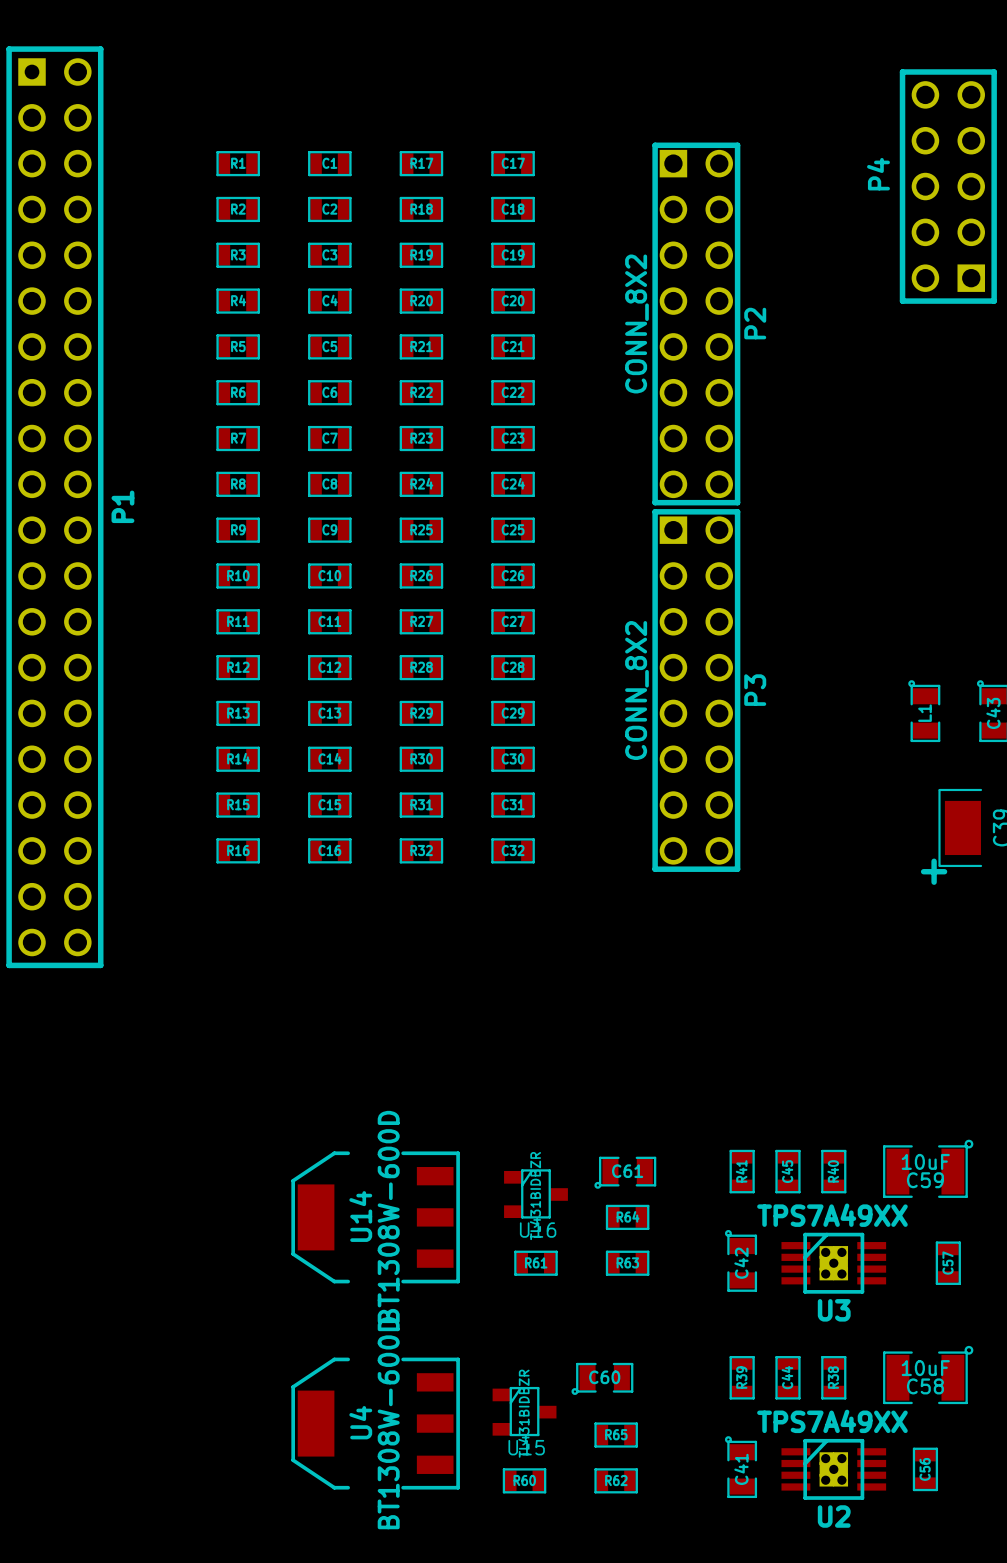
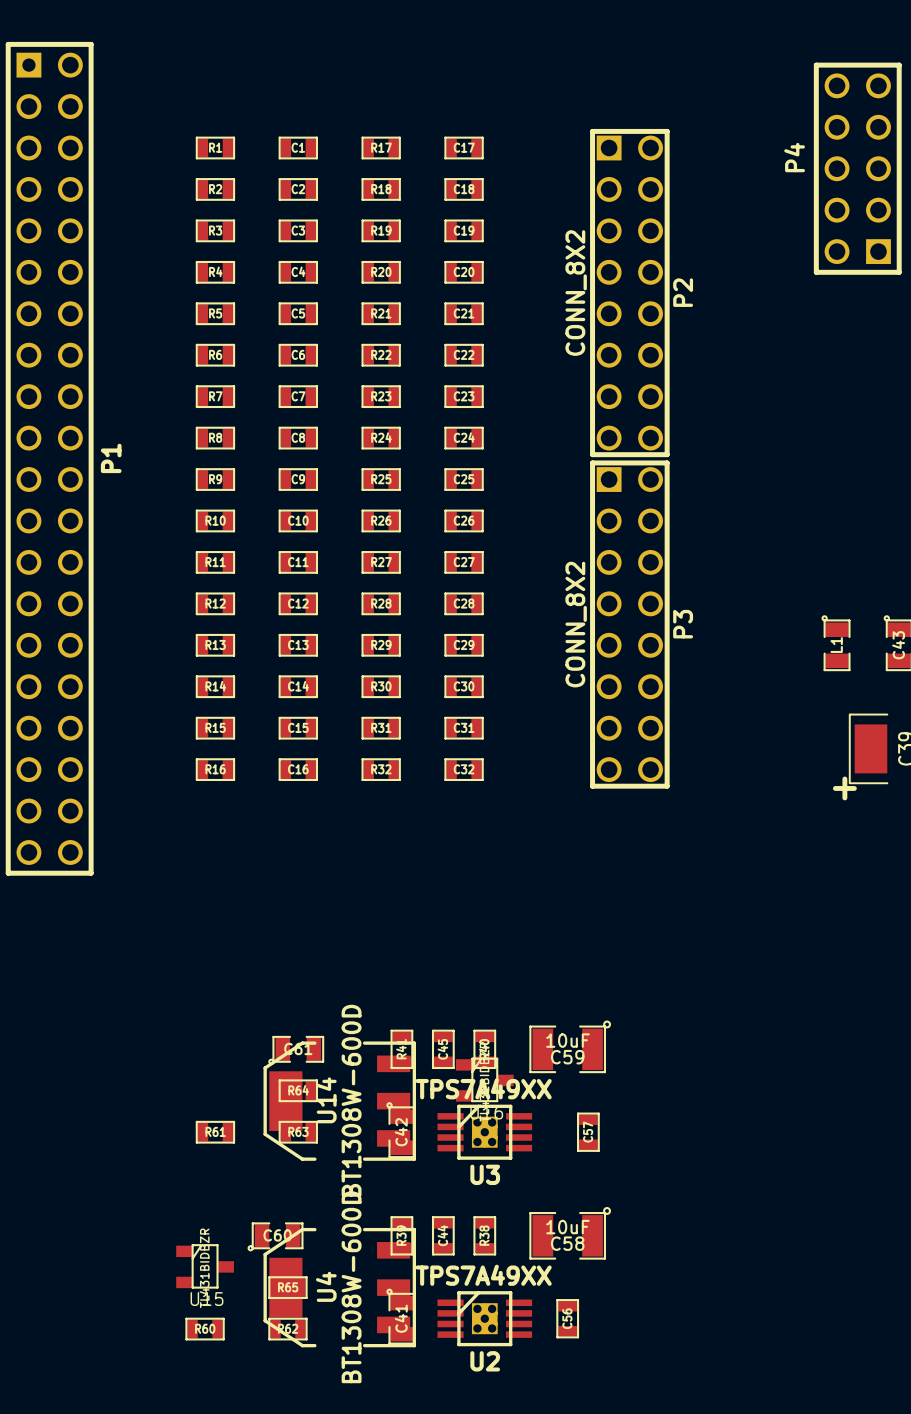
C59 position: (928, 1168) -> (570, 1046)
R41 position: (742, 1171) -> (401, 1049)
C45 position: (787, 1171) -> (443, 1049)
R40 position: (833, 1171) -> (484, 1049)
C61 position: (625, 1172) -> (296, 1050)
R64 position: (627, 1217) -> (298, 1090)
C42 position: (741, 1260) -> (400, 1130)
R61 position: (535, 1263) -> (215, 1132)
R63 position: (627, 1263) -> (298, 1132)
U3 position: (833, 1263) -> (484, 1132)
C57 position: (948, 1263) -> (588, 1132)
C58 position: (928, 1375) -> (570, 1233)
R39 position: (742, 1377) -> (401, 1235)
C44 position: (787, 1377) -> (443, 1235)
R38 position: (833, 1377) -> (484, 1235)
C60 position: (602, 1378) -> (275, 1236)
U15 position: (524, 1411) -> (205, 1266)
R65 position: (616, 1435) -> (287, 1287)
C41 position: (741, 1467) -> (400, 1316)
U2 position: (833, 1469) -> (484, 1318)
C56 position: (925, 1469) -> (567, 1318)
R60 position: (524, 1480) -> (205, 1329)
R62 position: (616, 1480) -> (287, 1329)

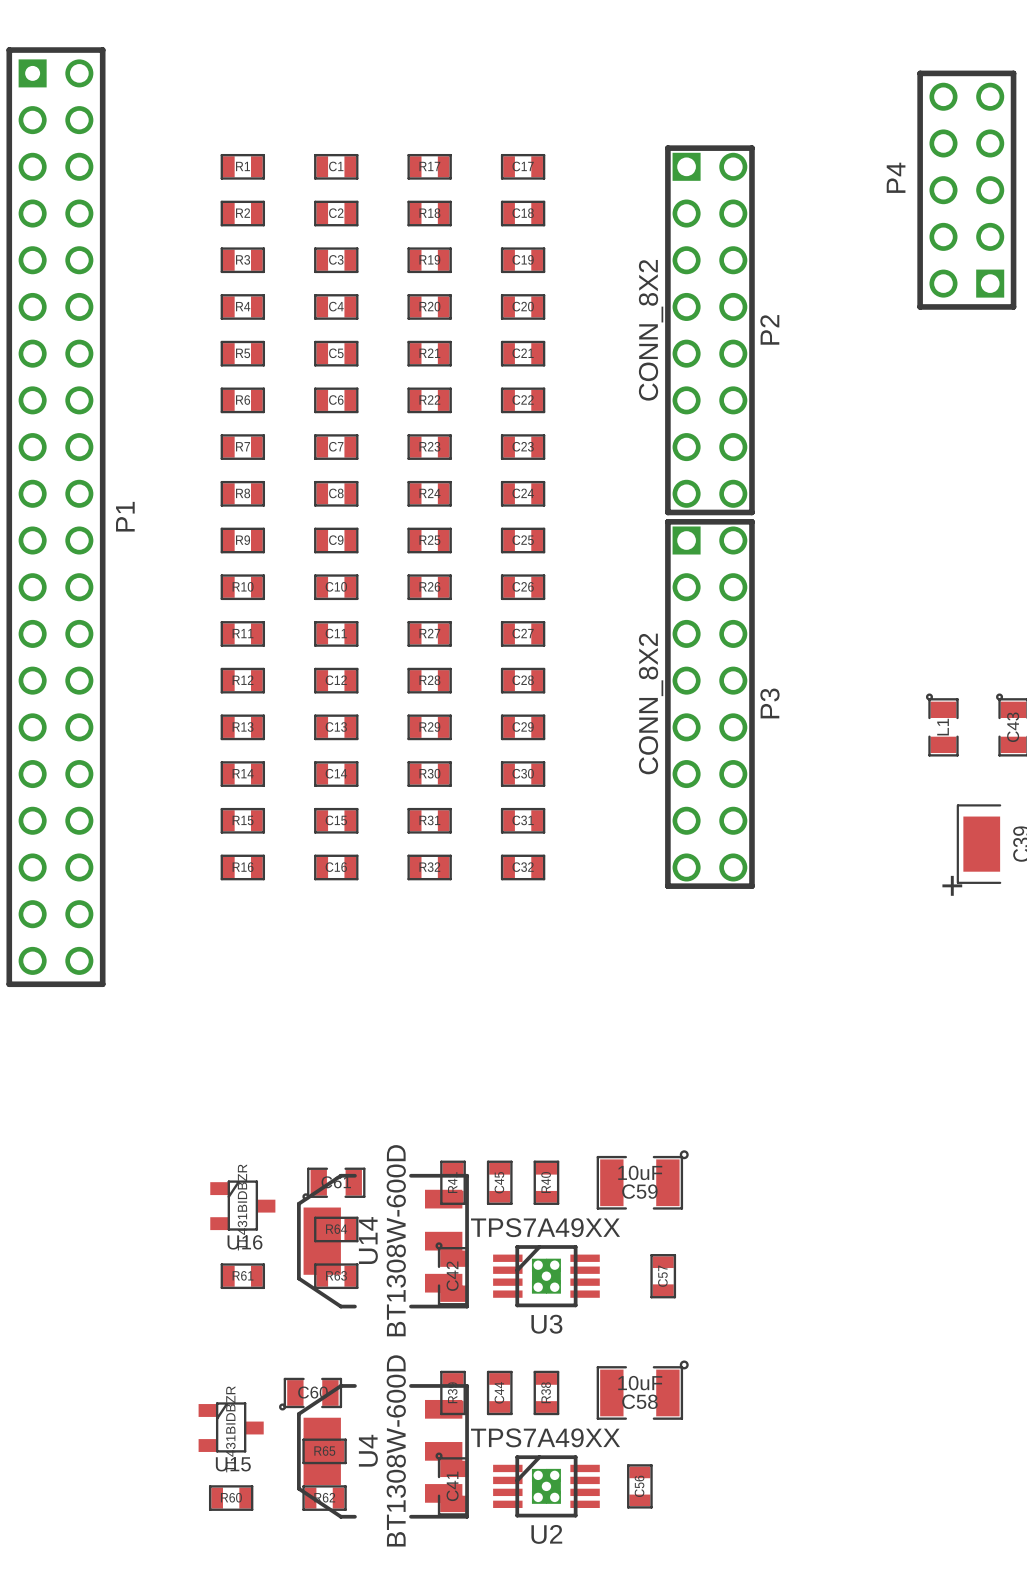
U16 position: (484, 1079) -> (242, 1205)

